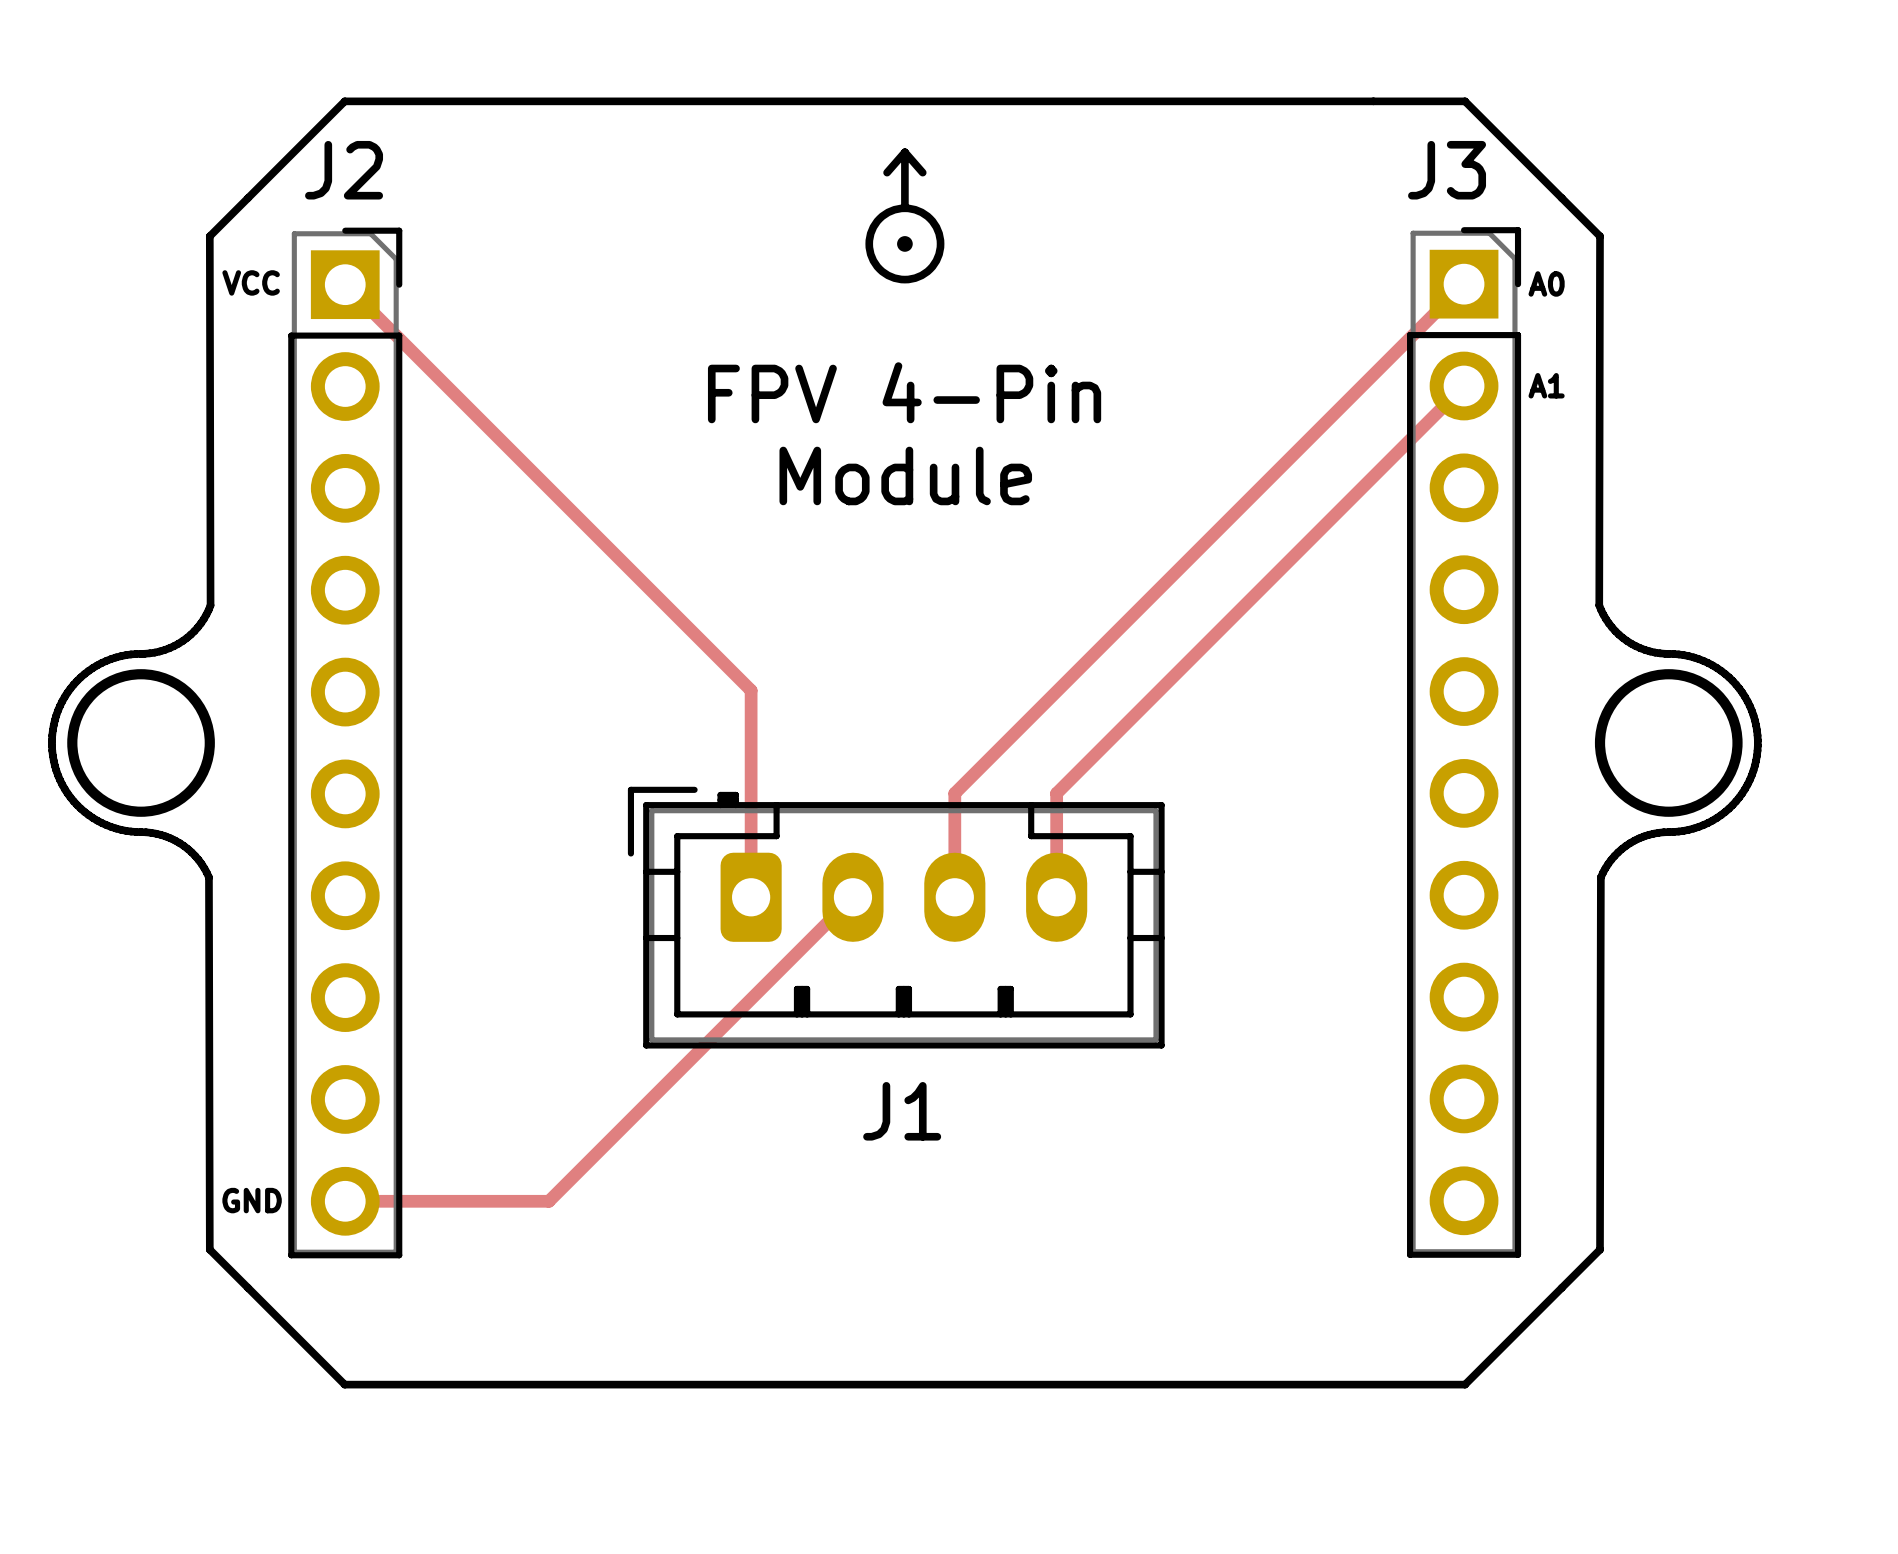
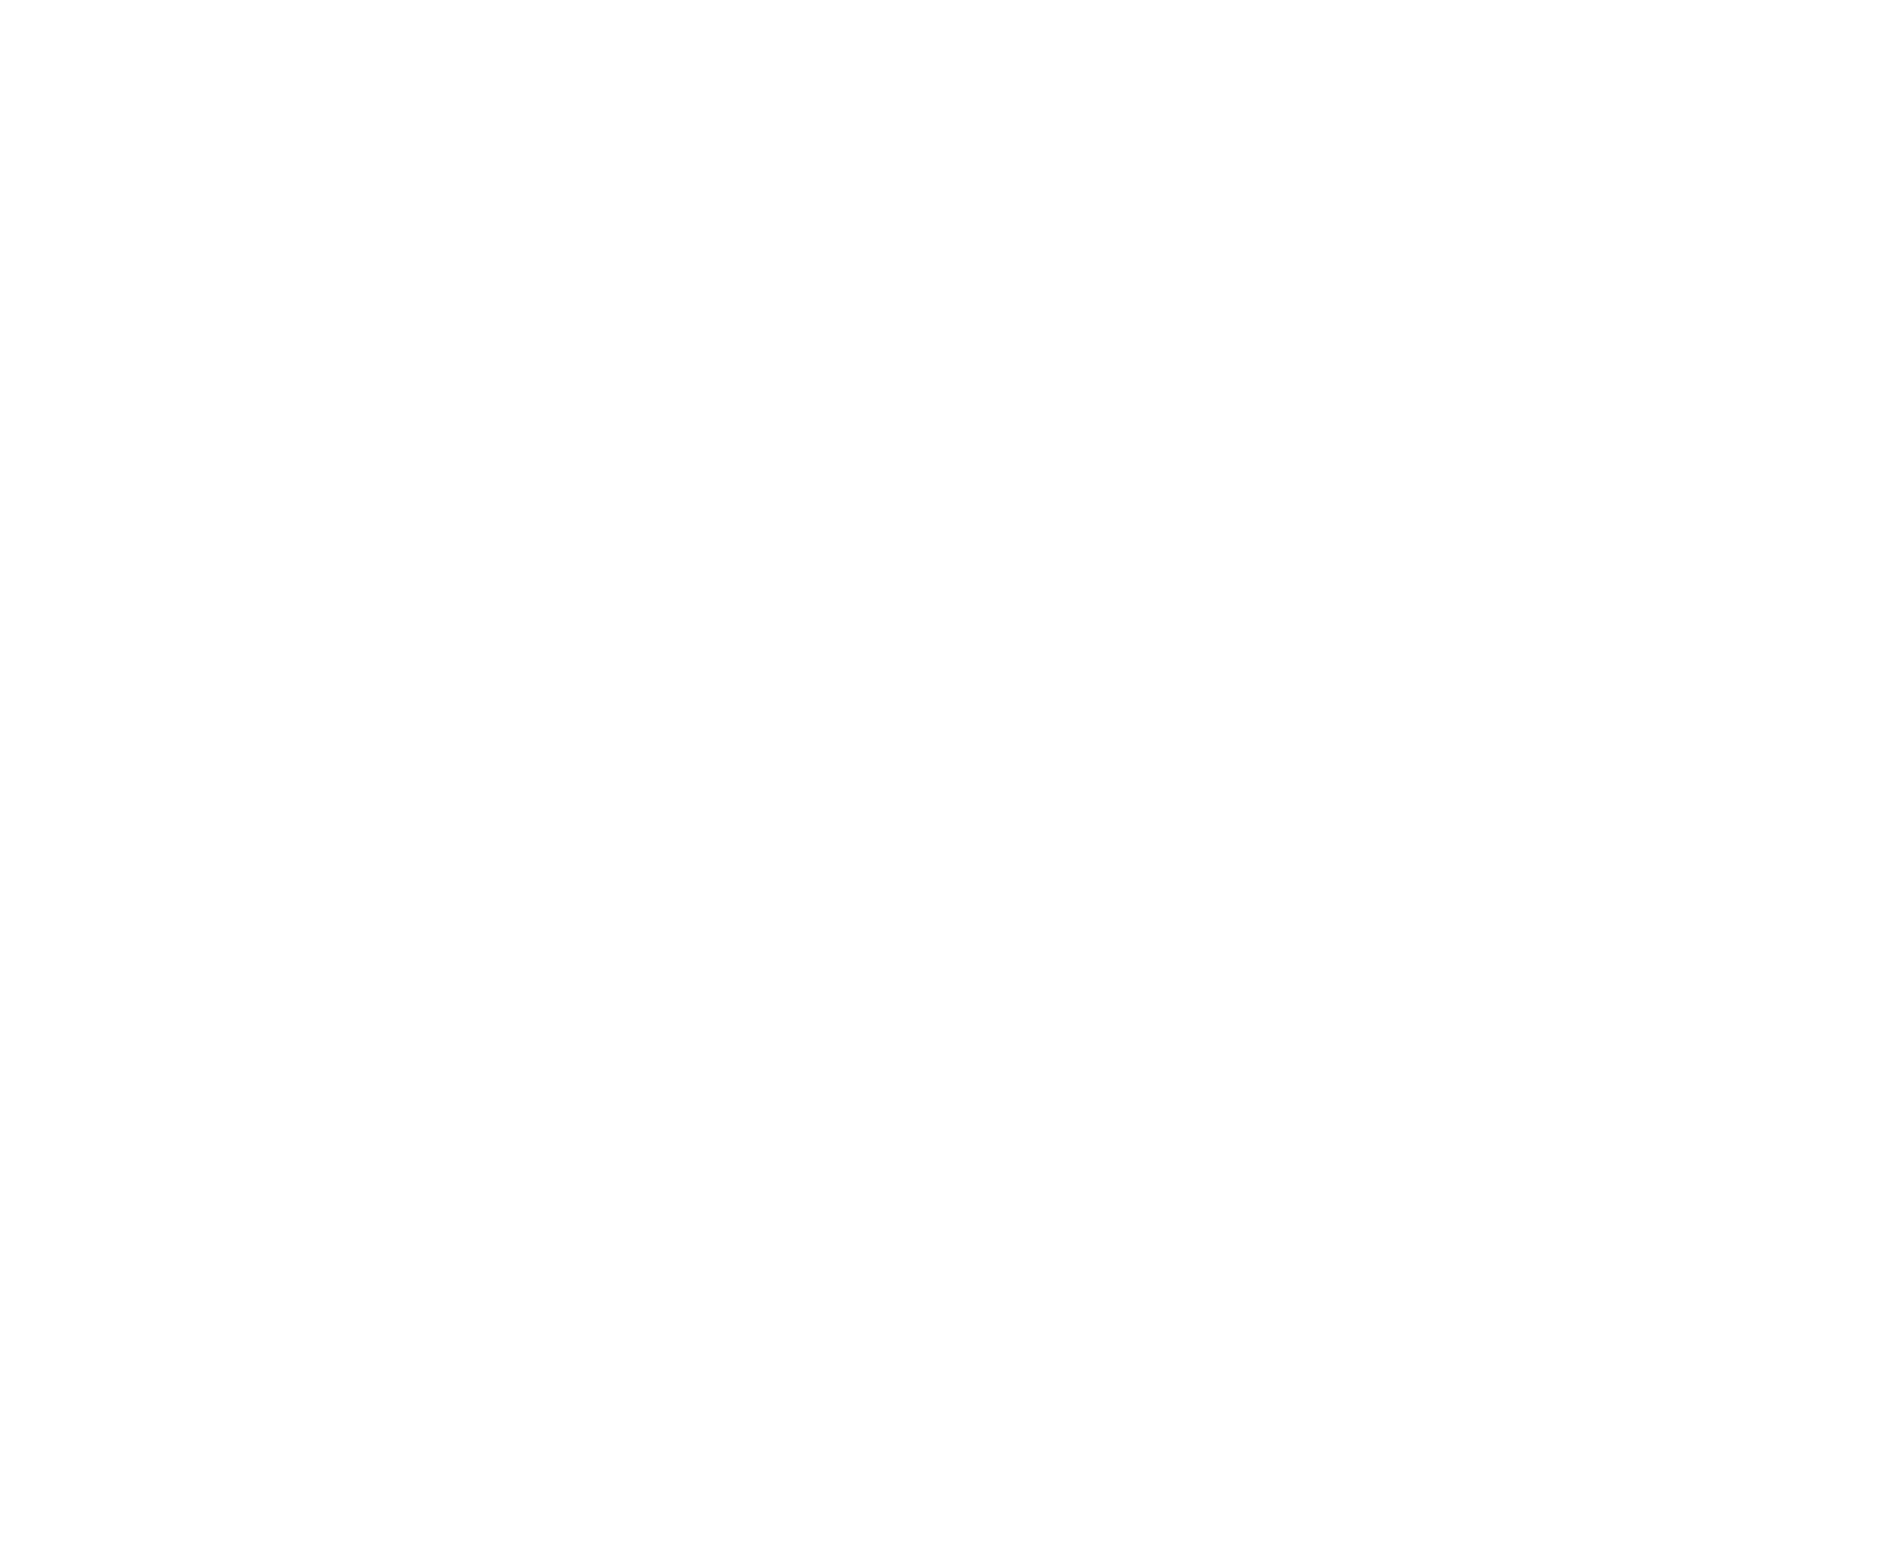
board edge: (344, 101) (1465, 101) (1600, 236) (1599, 605) (1611, 627) (1631, 643) (1650, 651) (1683, 655) (1698, 659) (1716, 668) (1729, 677) (1742, 692) (1751, 710) (1756, 730) (1756, 755) (1753, 770) (1745, 789) (1736, 801) (1721, 815) (1693, 828) (1653, 833) (1634, 840) (1614, 856) (1603, 872) (1600, 877) (1600, 1249) (1465, 1384) (344, 1384) (209, 1249) (208, 877) (195, 856) (175, 840) (156, 833) (125, 830) (111, 826) (92, 818) (80, 808) (67, 793) (56, 770) (52, 750) (52, 730) (58, 710) (64, 697) (84, 674) (101, 663) (115, 657) (154, 652) (174, 646) (194, 631) (208, 610) (210, 605) (209, 236) (344, 101) -> none
drawing: [865, 148, 945, 284] -> none
text: VCC (251, 282) -> none
text: A0 (1546, 283) -> none
top track: (345, 284) (751, 690) (751, 897) -> none
top track: (1464, 284) (954, 793) (954, 897) -> none
text: A1 (1546, 385) -> none
top track: (1464, 386) (1056, 793) (1056, 897) -> none
text: FPV 4-Pin (904, 392) -> none
text: Module (905, 475) -> none
round board edge: [67, 669, 215, 817] -> none
round board edge: [1594, 669, 1743, 817] -> none
J2: (345, 742) -> none
J3: (1464, 742) -> none
top track: (852, 897) (548, 1201) (345, 1201) -> none
J1: (896, 917) -> none
text: GND (252, 1200) -> none

